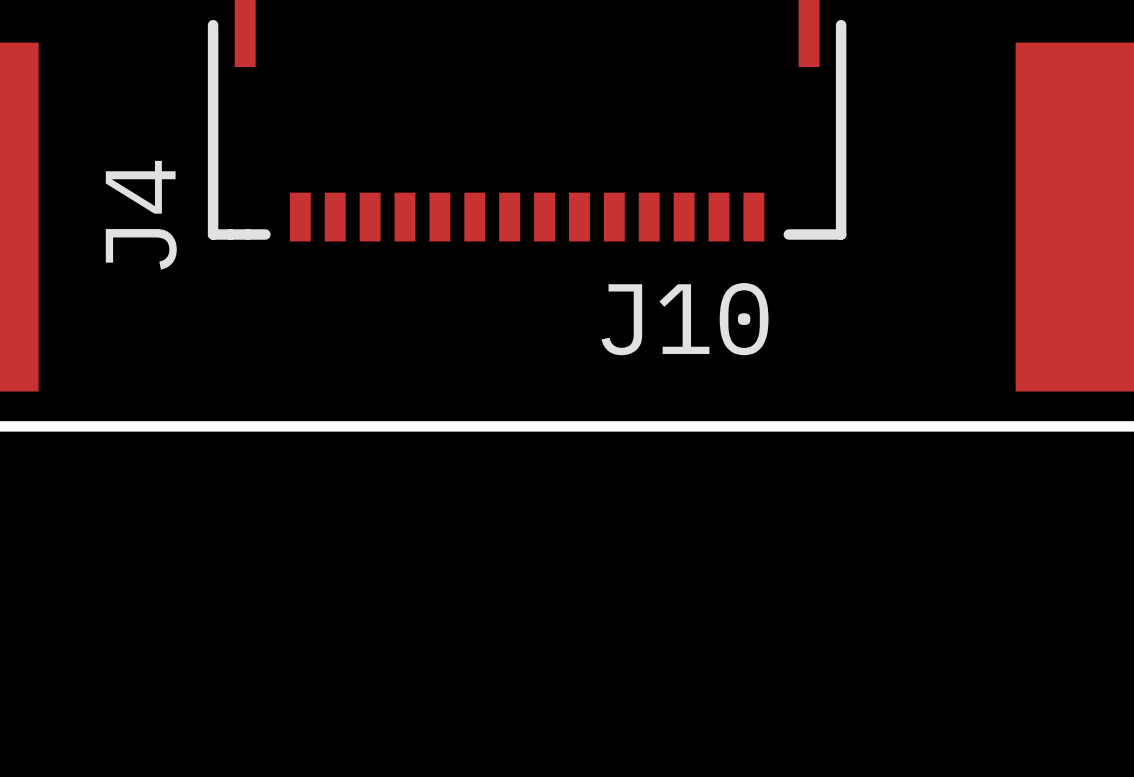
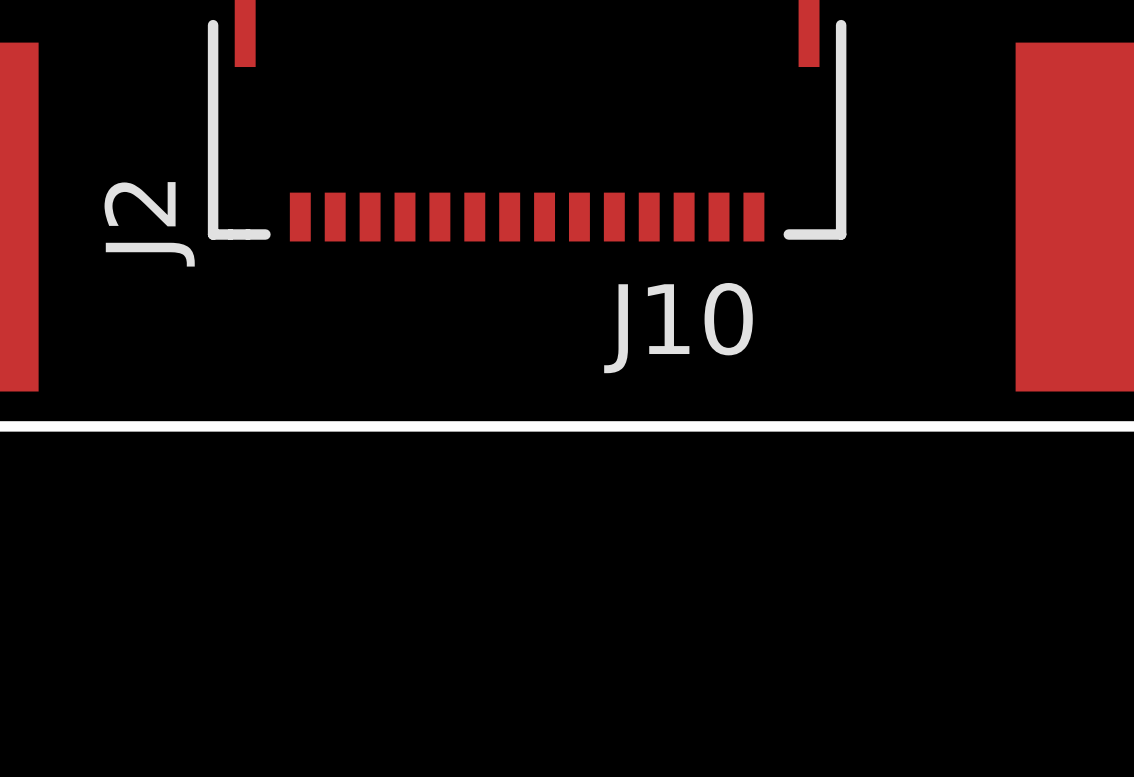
J4 name: J4 (141, 215) -> J2 (149, 224)

